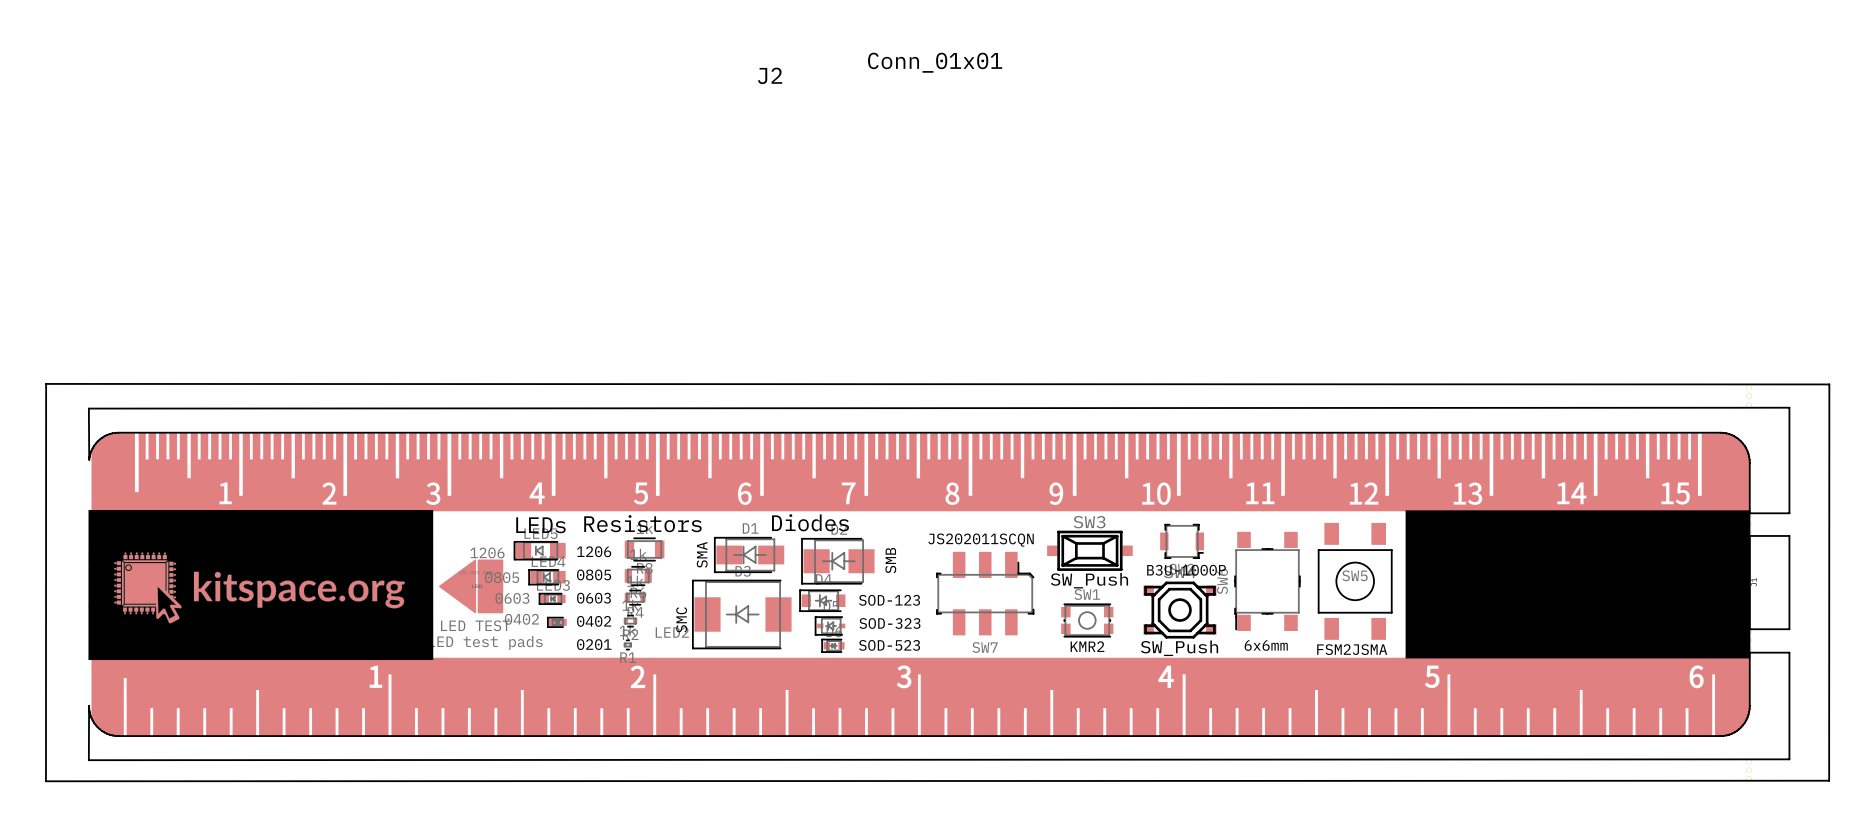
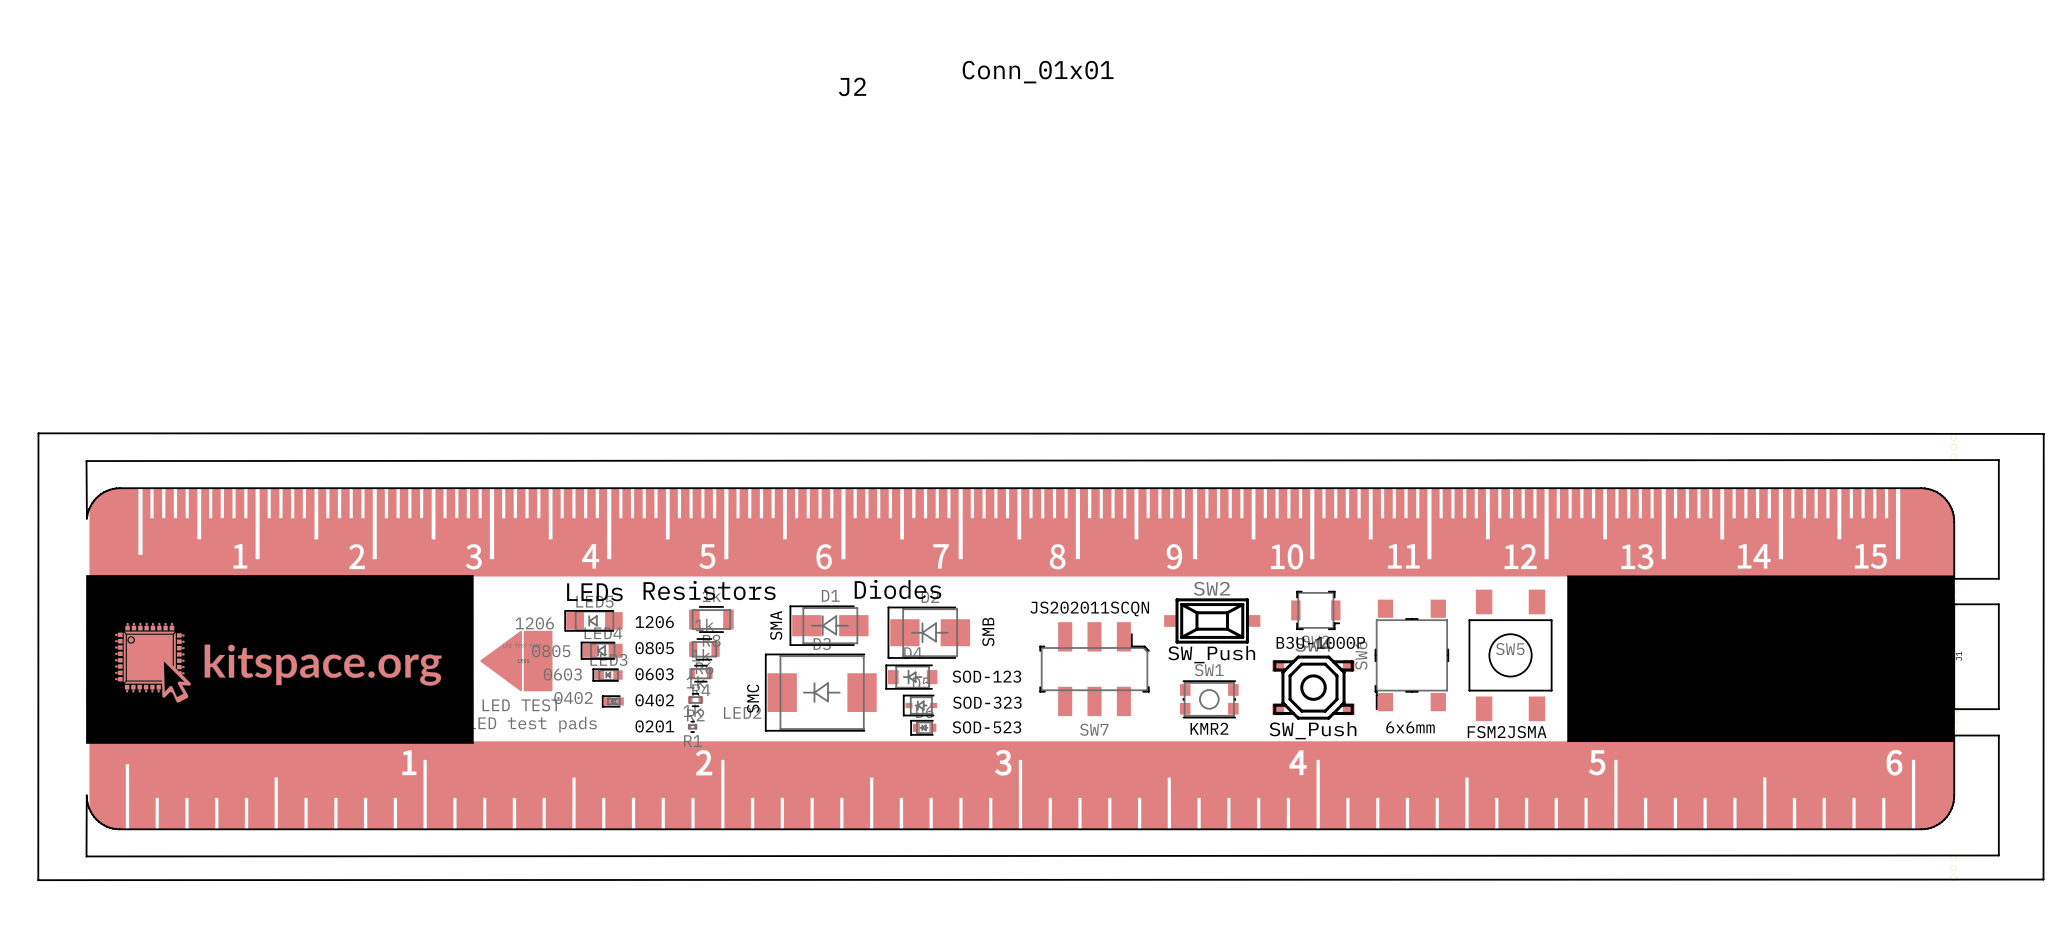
SW3 name: SW3 (1089, 522) -> SW2 (1212, 588)

